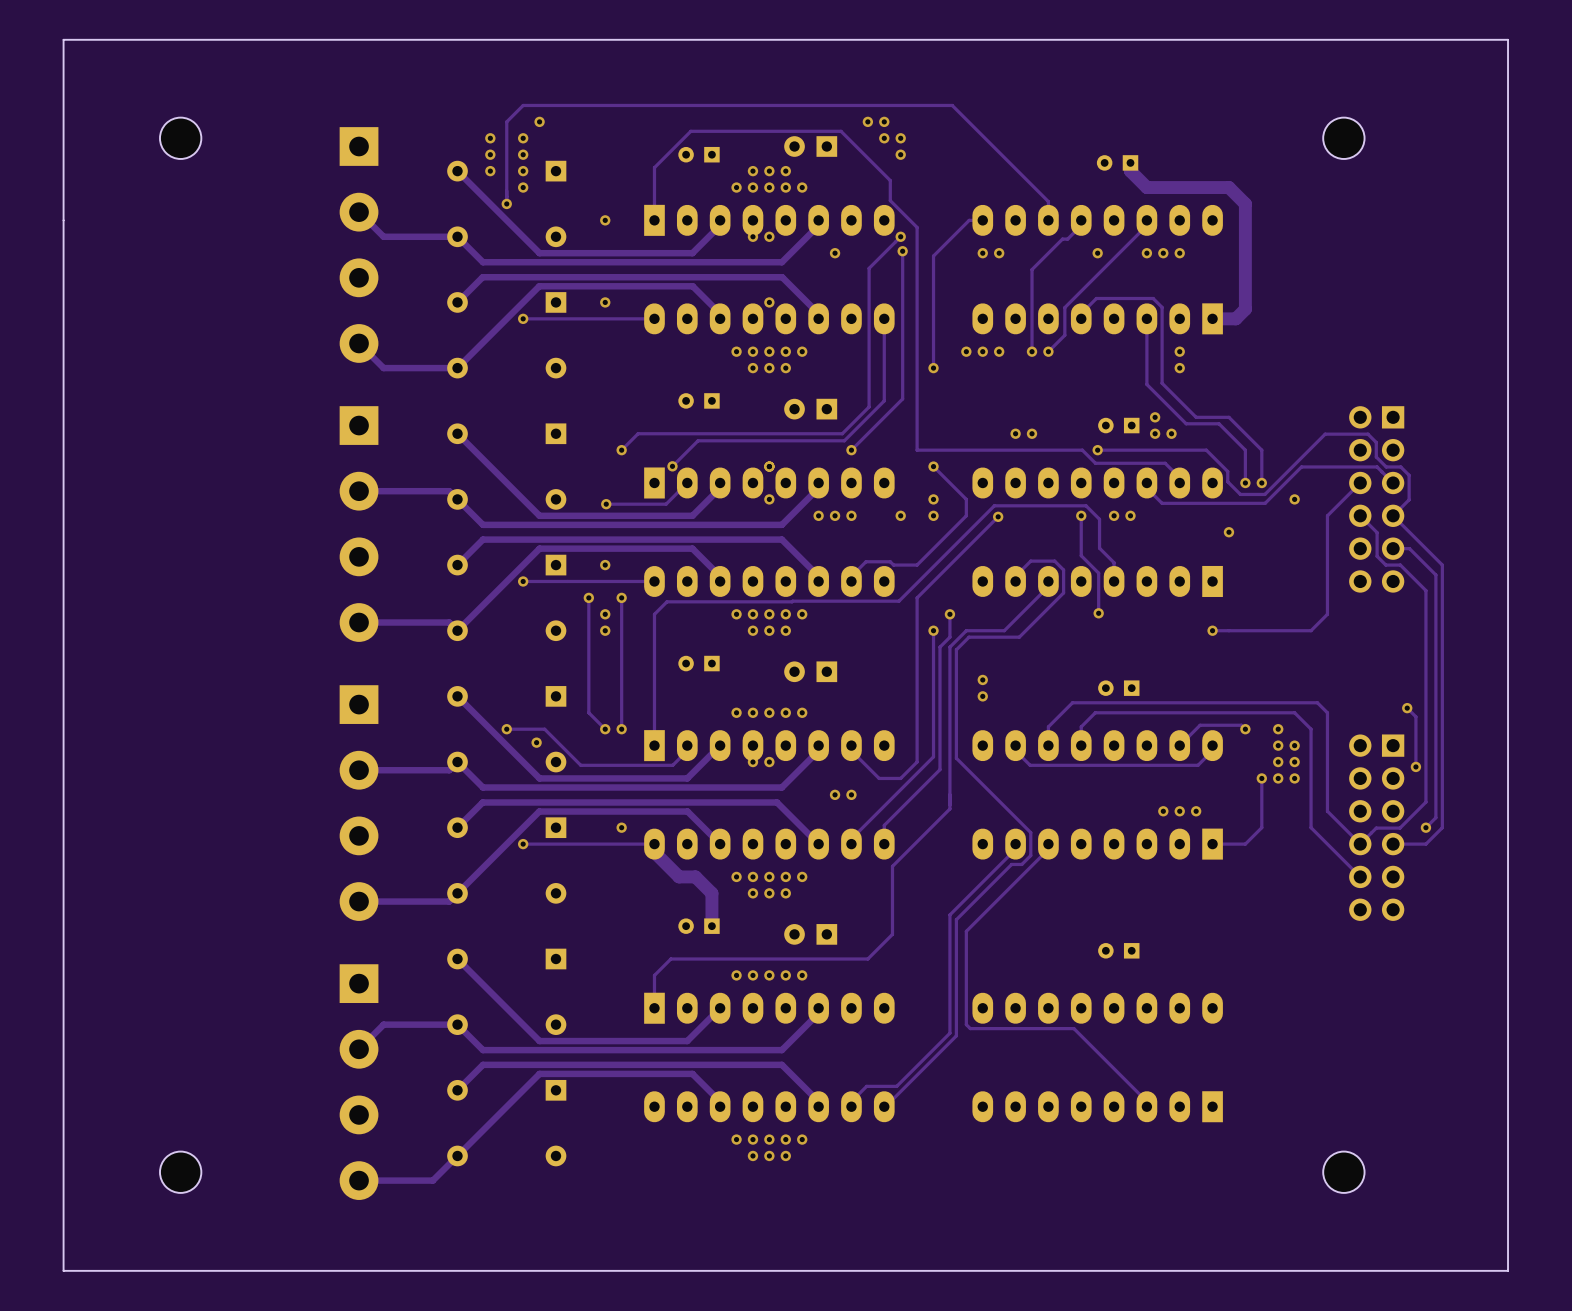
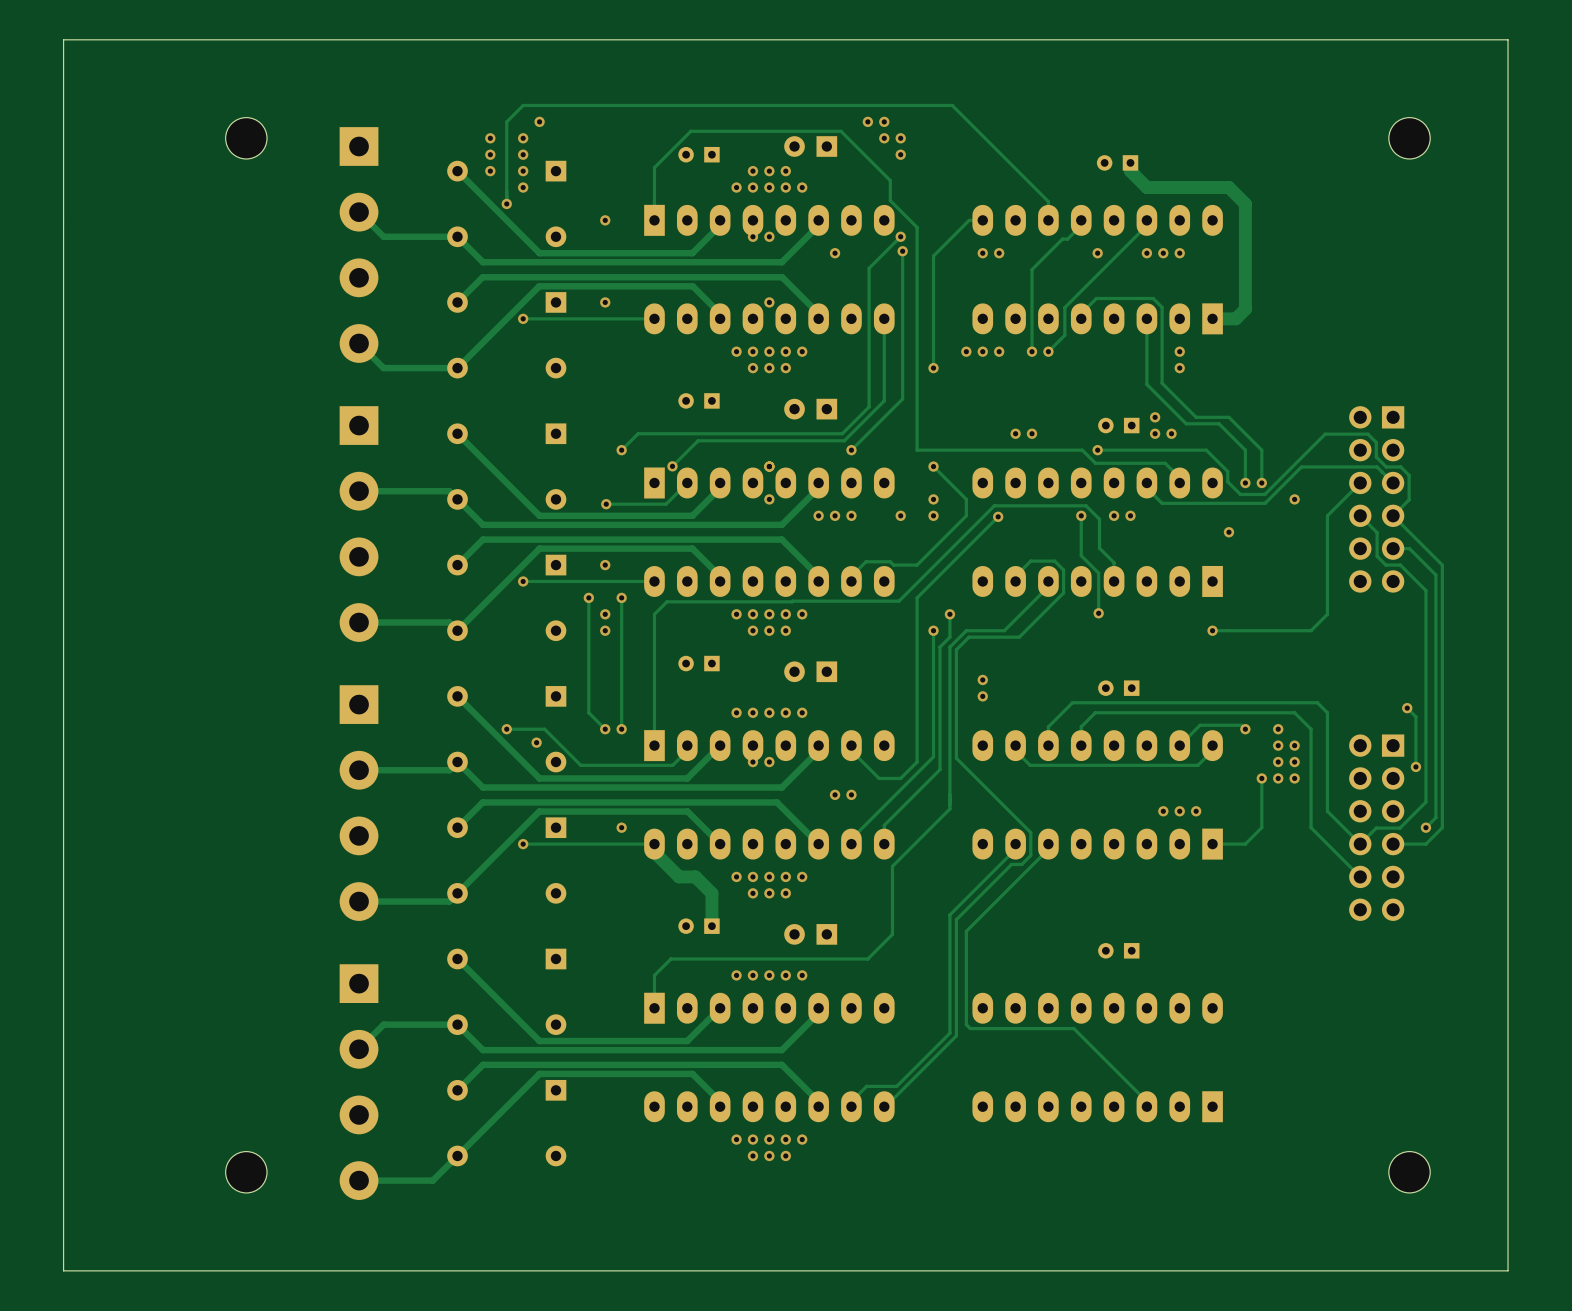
part position: (180, 138) -> (246, 138)
part position: (1343, 138) -> (1409, 138)
part position: (180, 1172) -> (246, 1172)
part position: (1343, 1172) -> (1409, 1172)

